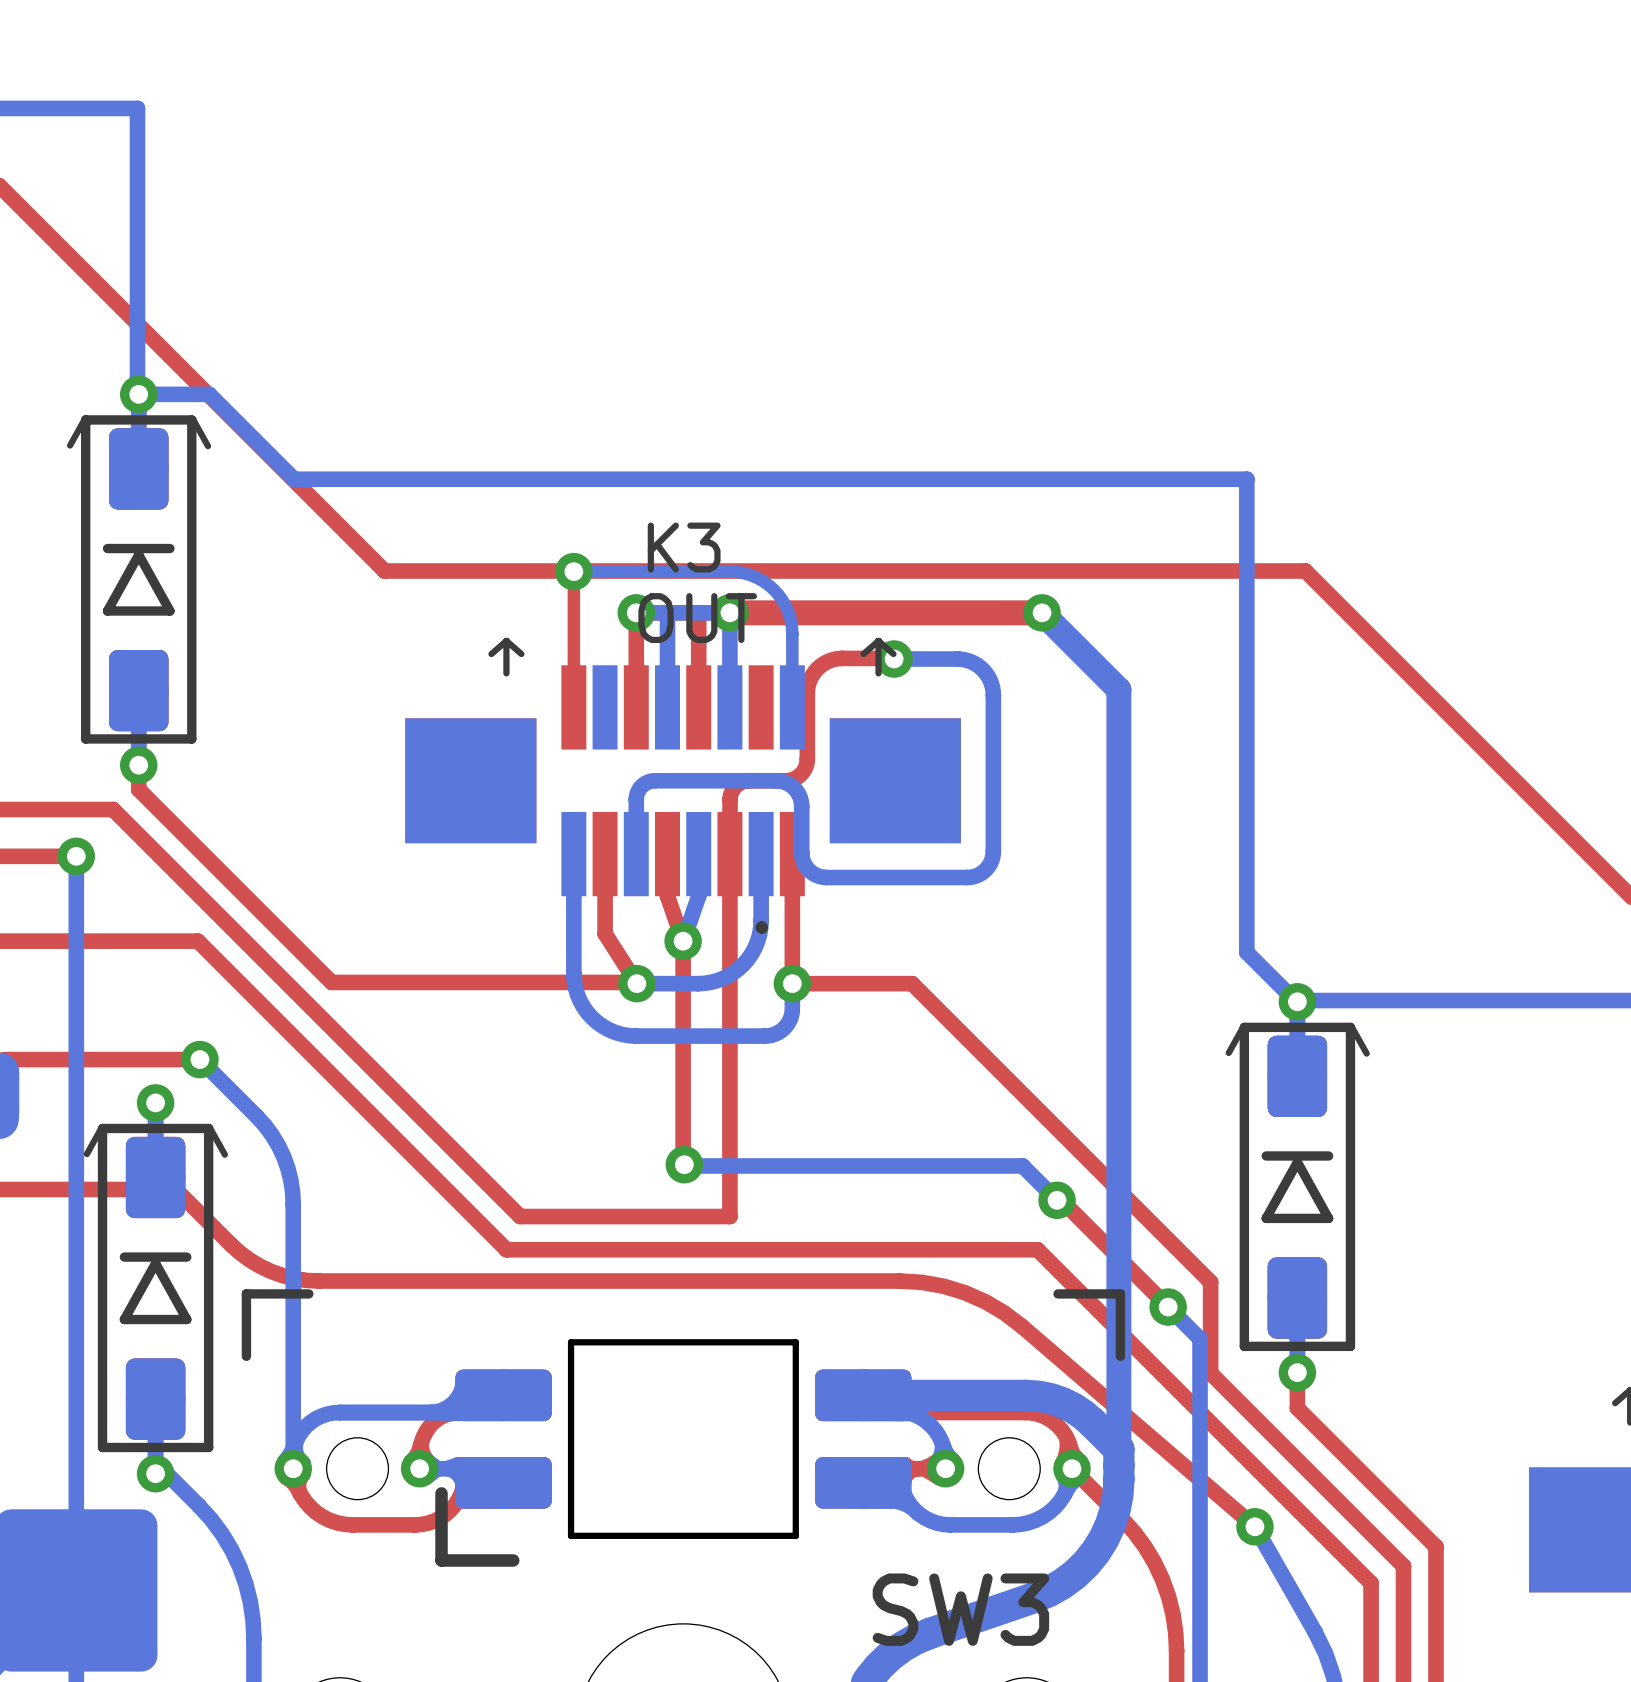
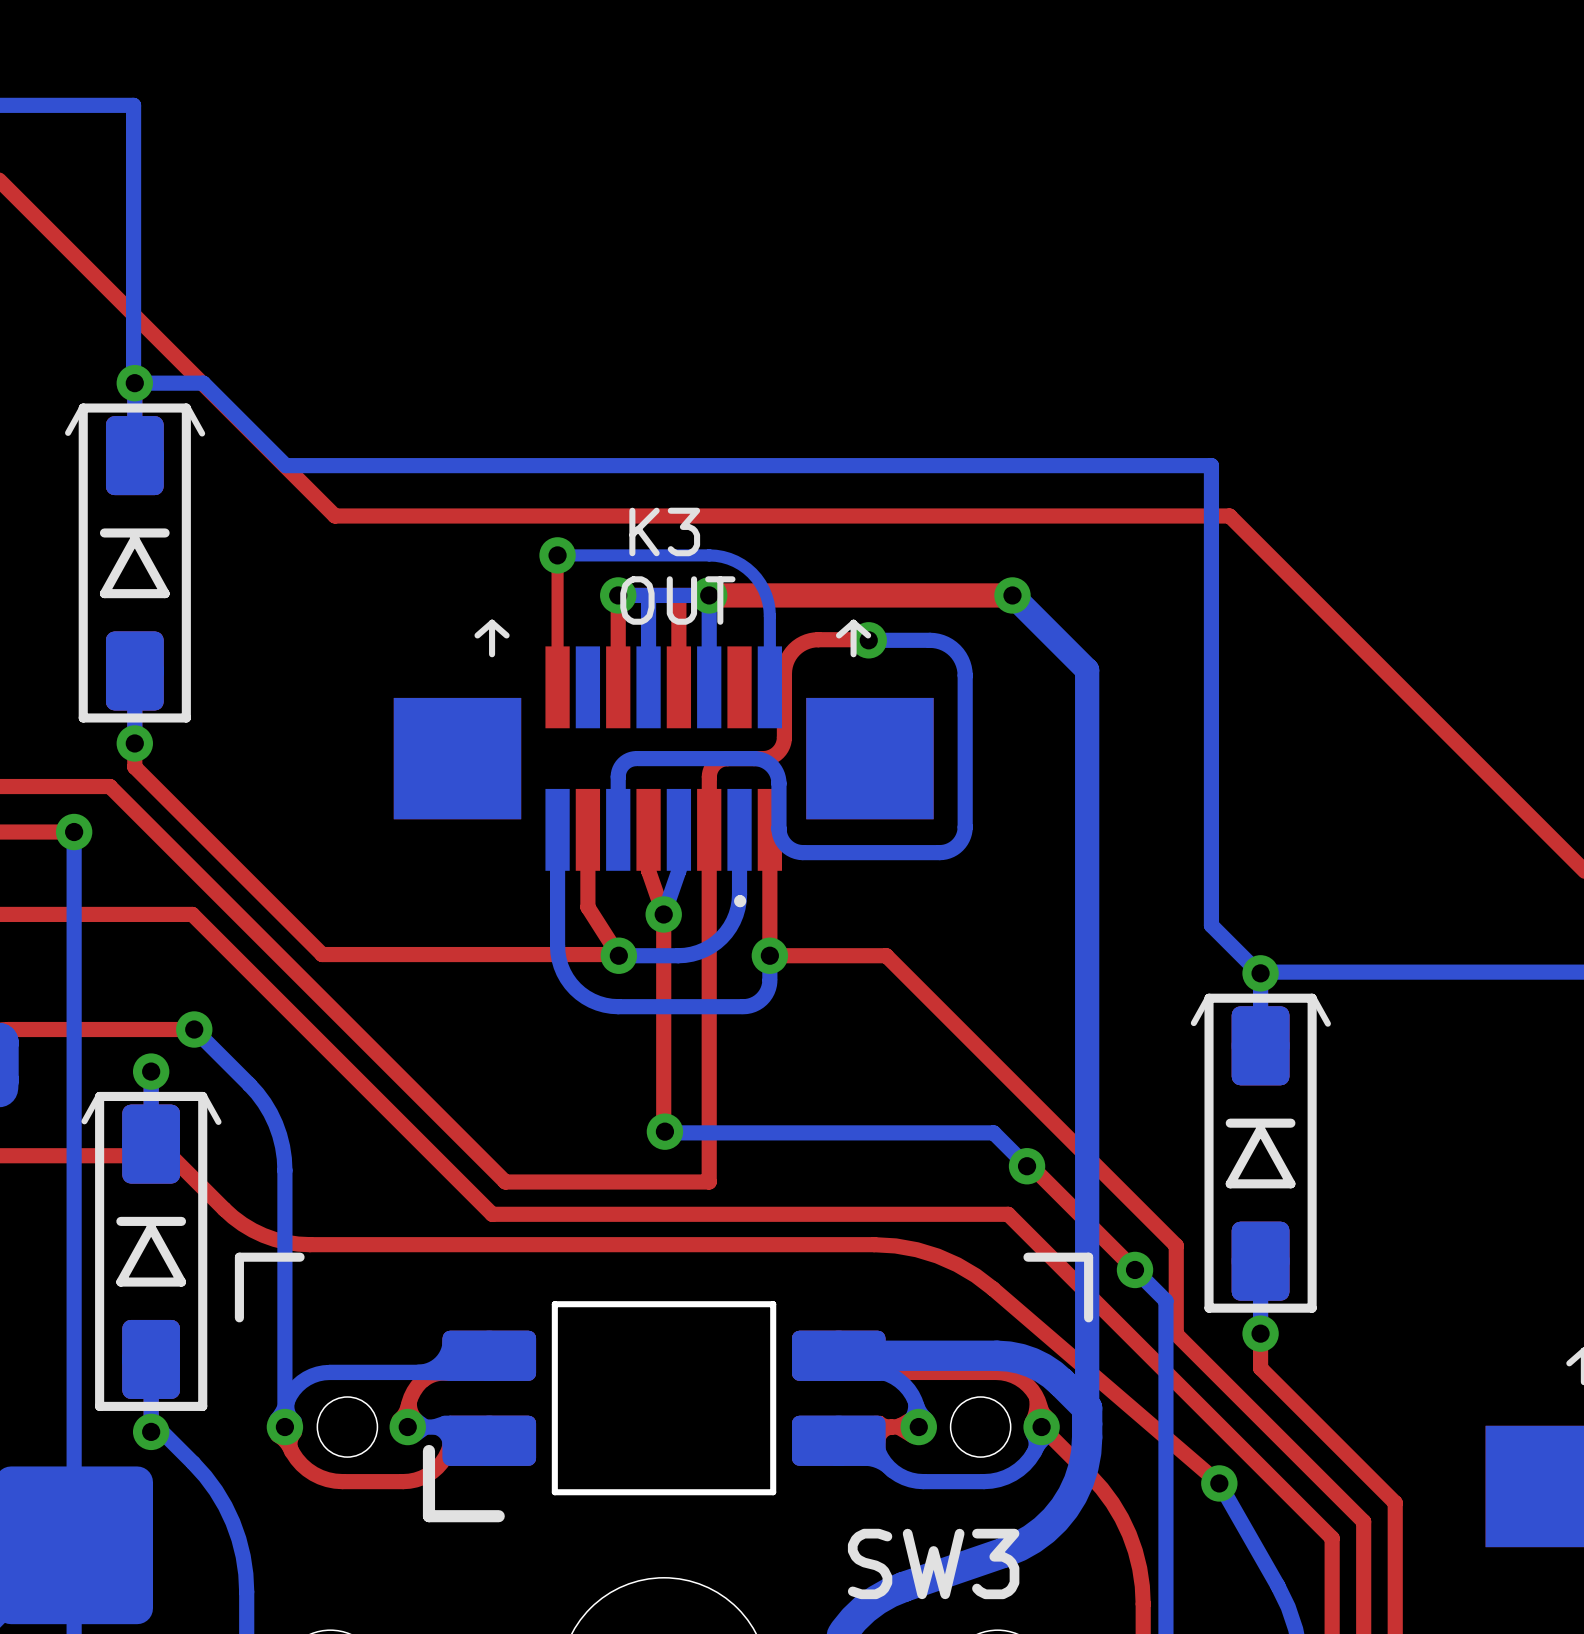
top track: (344, 531) (384, 571) (1305, 571) -> (334, 516) (1229, 516) (1268, 554)

